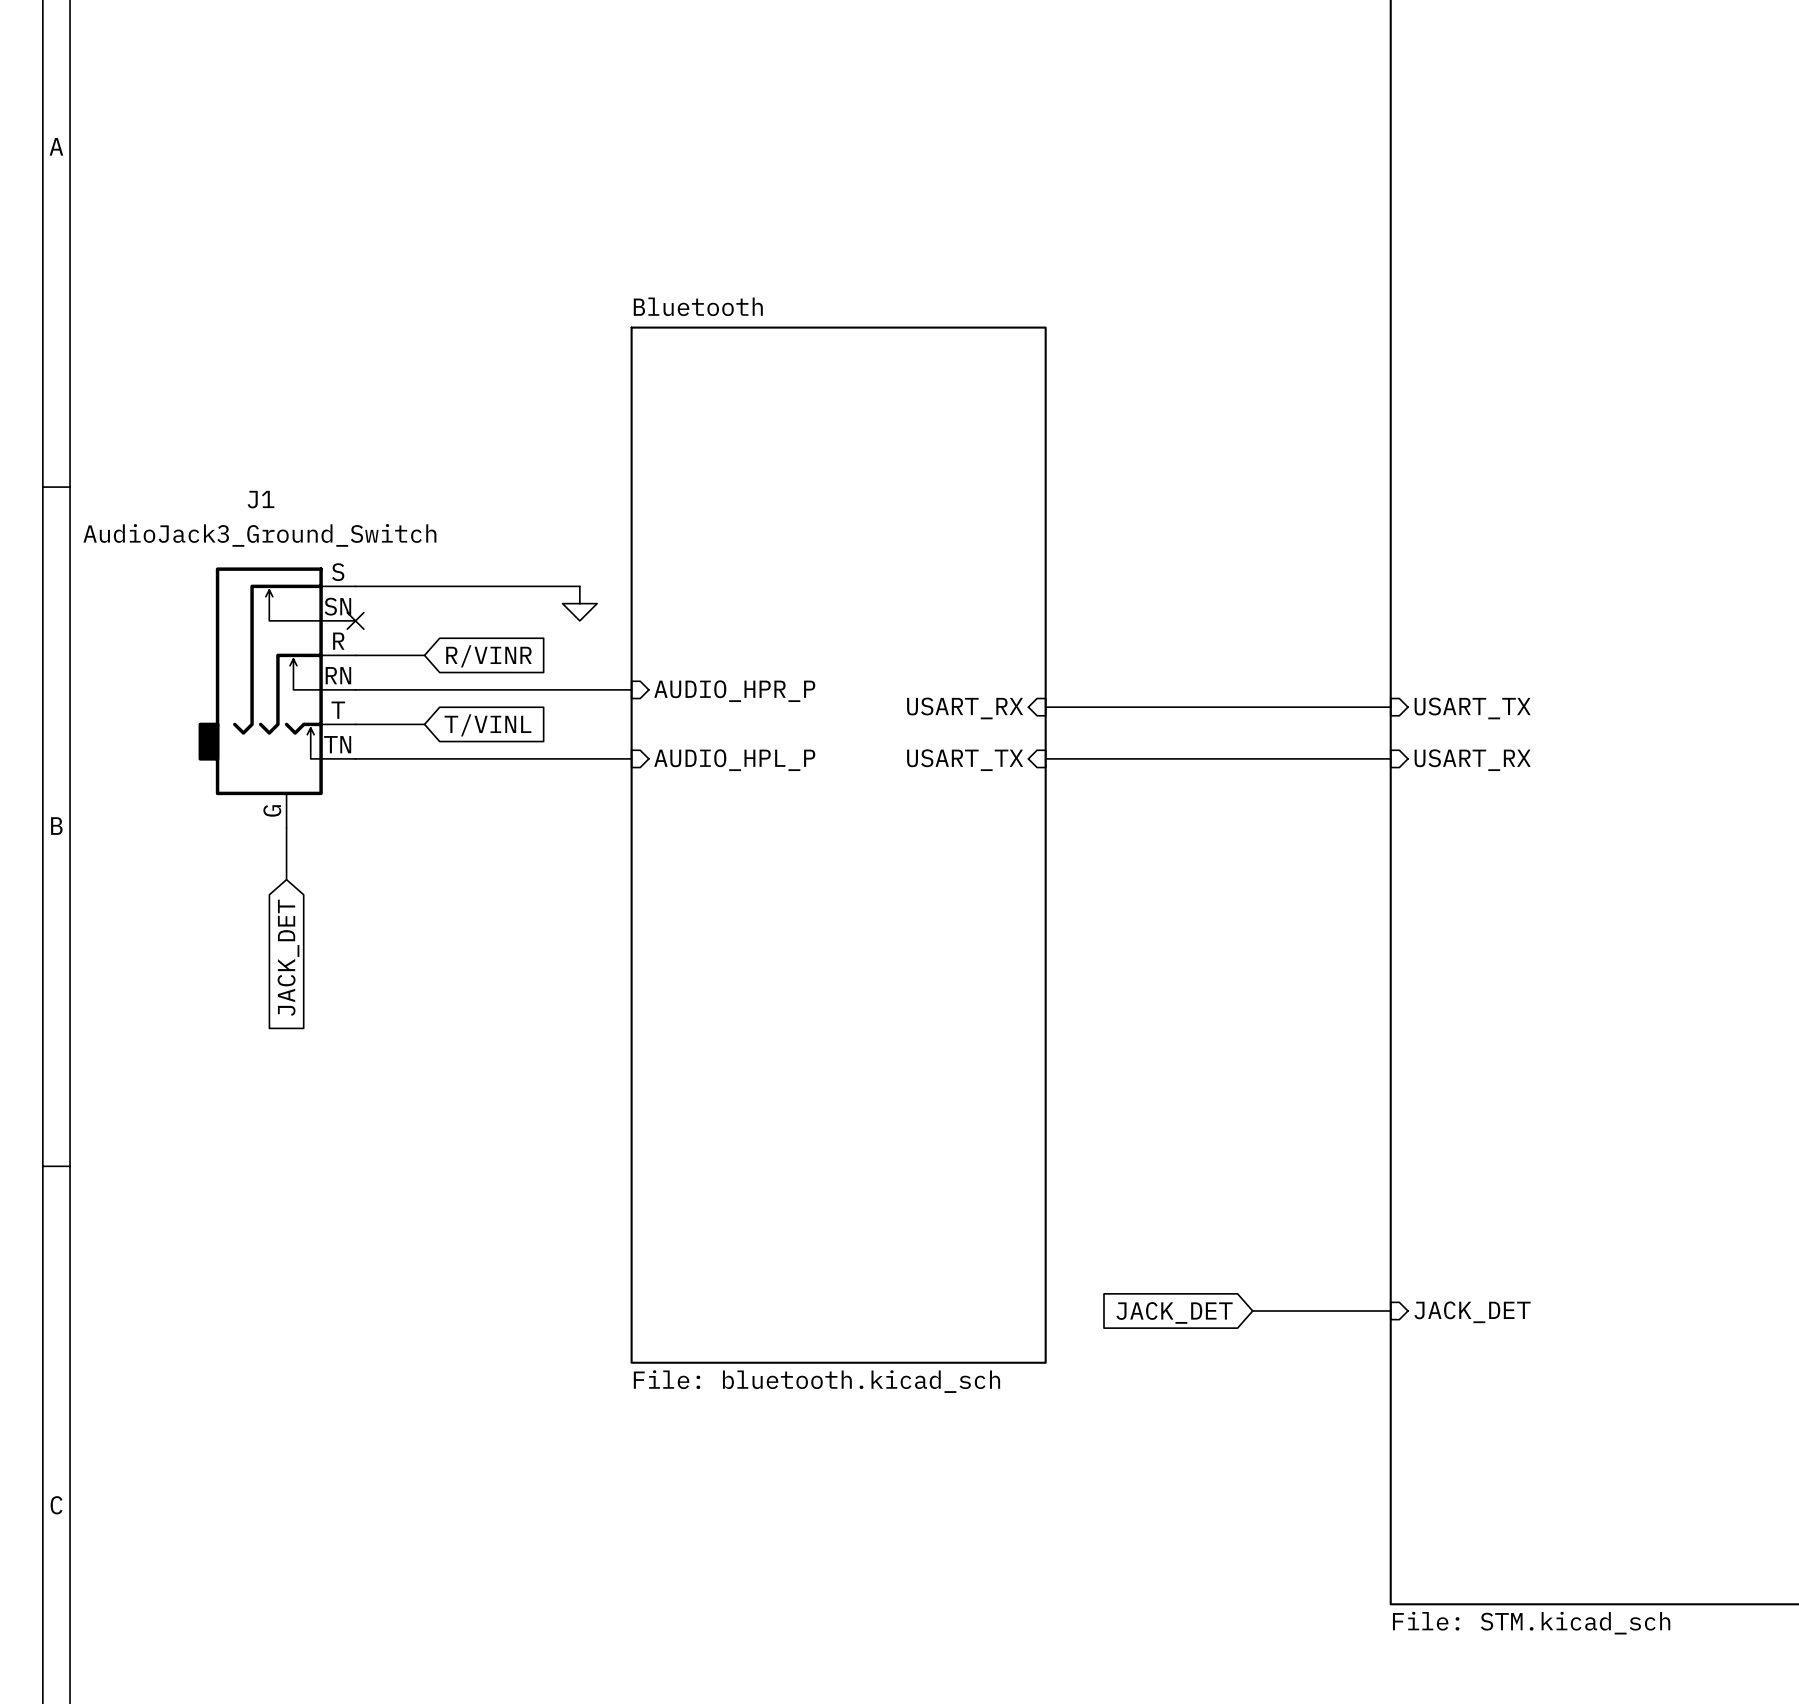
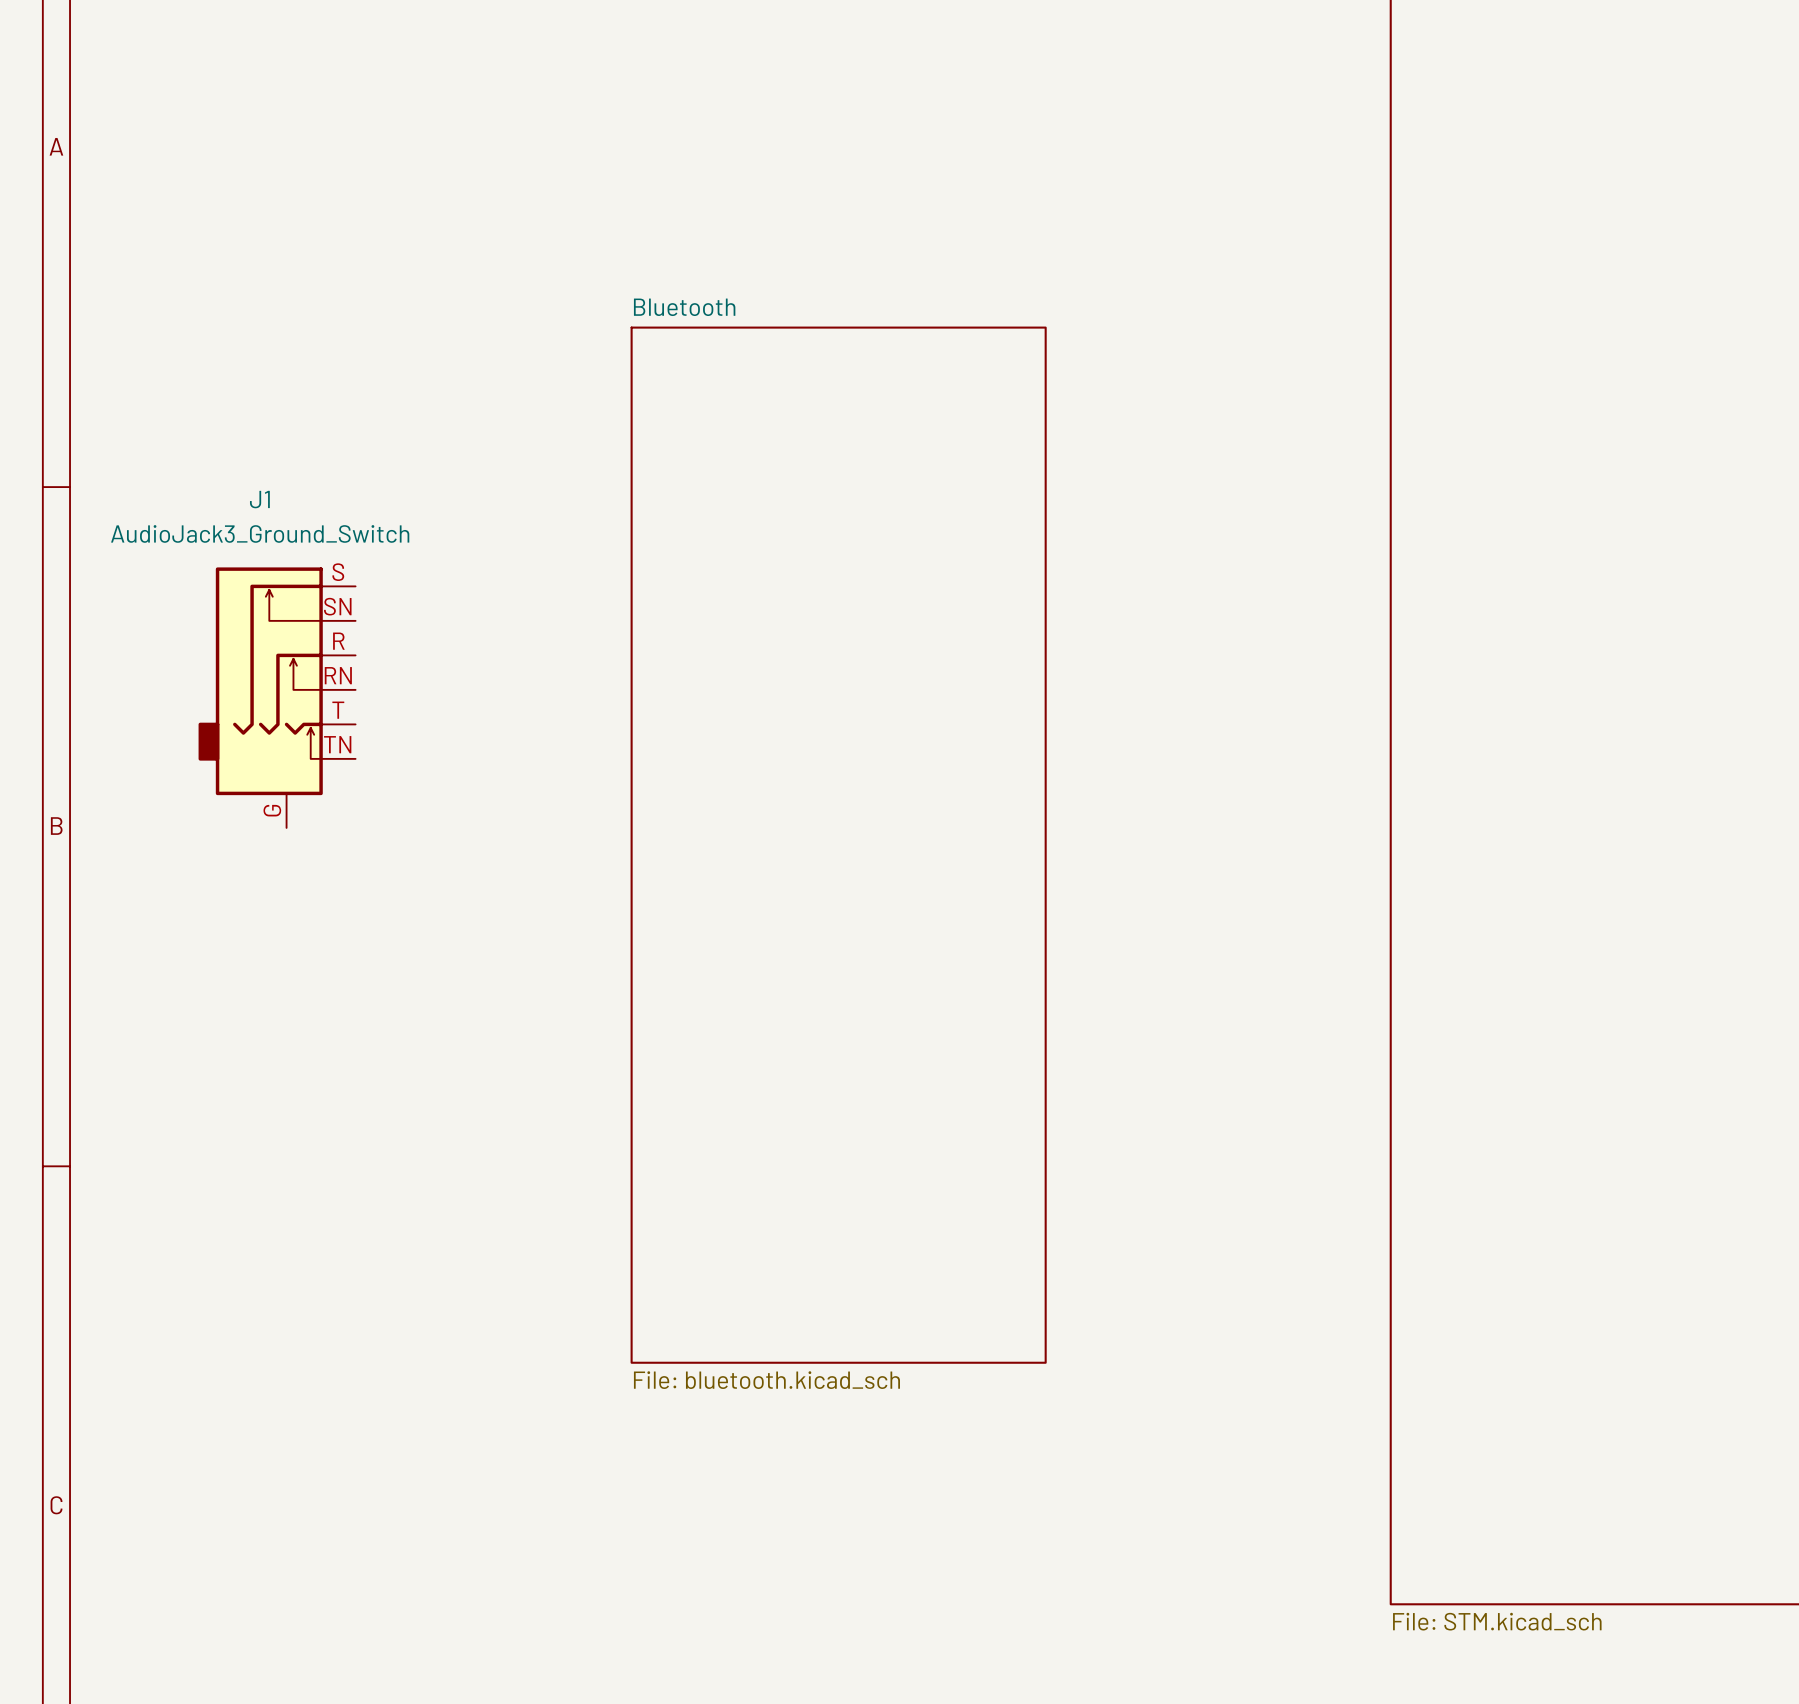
wire: (355, 586) (579, 586) -> none
power symbol: (579, 603) -> none
no-connect mark: (355, 620) -> none
wire: (355, 655) (424, 655) -> none
global label: R/VINR (488, 656) -> none
wire: (355, 689) (631, 689) -> none
sheet pin: AUDIO_HPR_P (734, 691) -> none
wire: (1045, 707) (1390, 707) -> none
sheet pin: USART_RX (965, 708) -> none
sheet pin: USART_TX (1472, 708) -> none
wire: (355, 724) (424, 724) -> none
global label: T/VINL (487, 725) -> none
wire: (355, 758) (631, 758) -> none
wire: (1045, 758) (1390, 758) -> none
sheet pin: AUDIO_HPL_P (734, 760) -> none
sheet pin: USART_TX (965, 760) -> none
sheet pin: USART_RX (1472, 760) -> none
wire: (286, 827) (286, 879) -> none
global label: JACK_DET (288, 957) -> none
wire: (1252, 1310) (1390, 1310) -> none
global label: JACK_DET (1174, 1312) -> none
sheet pin: JACK_DET (1472, 1312) -> none

